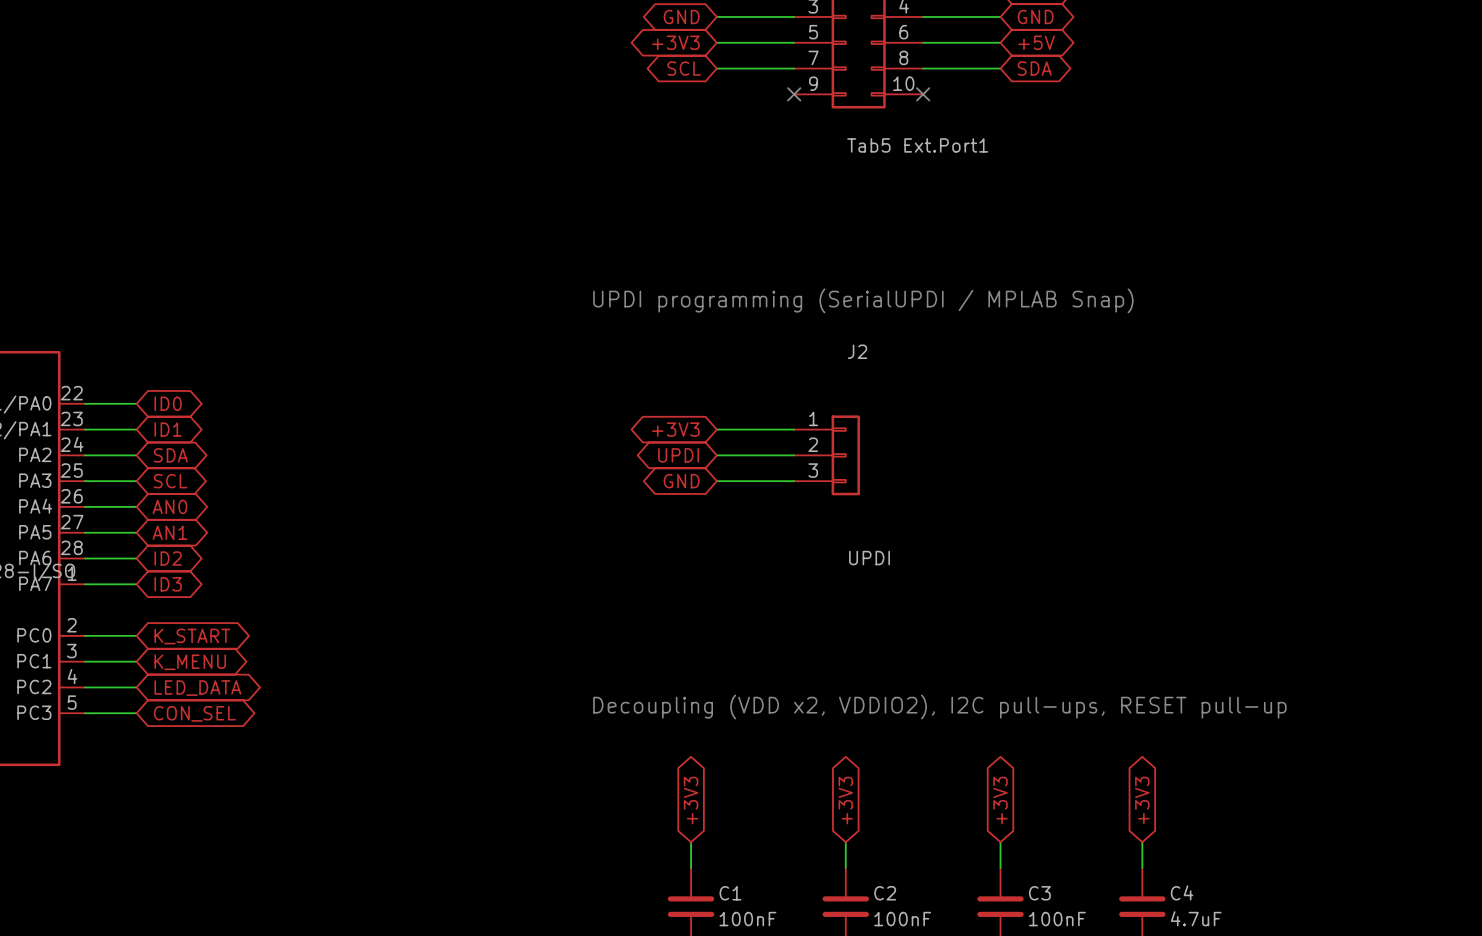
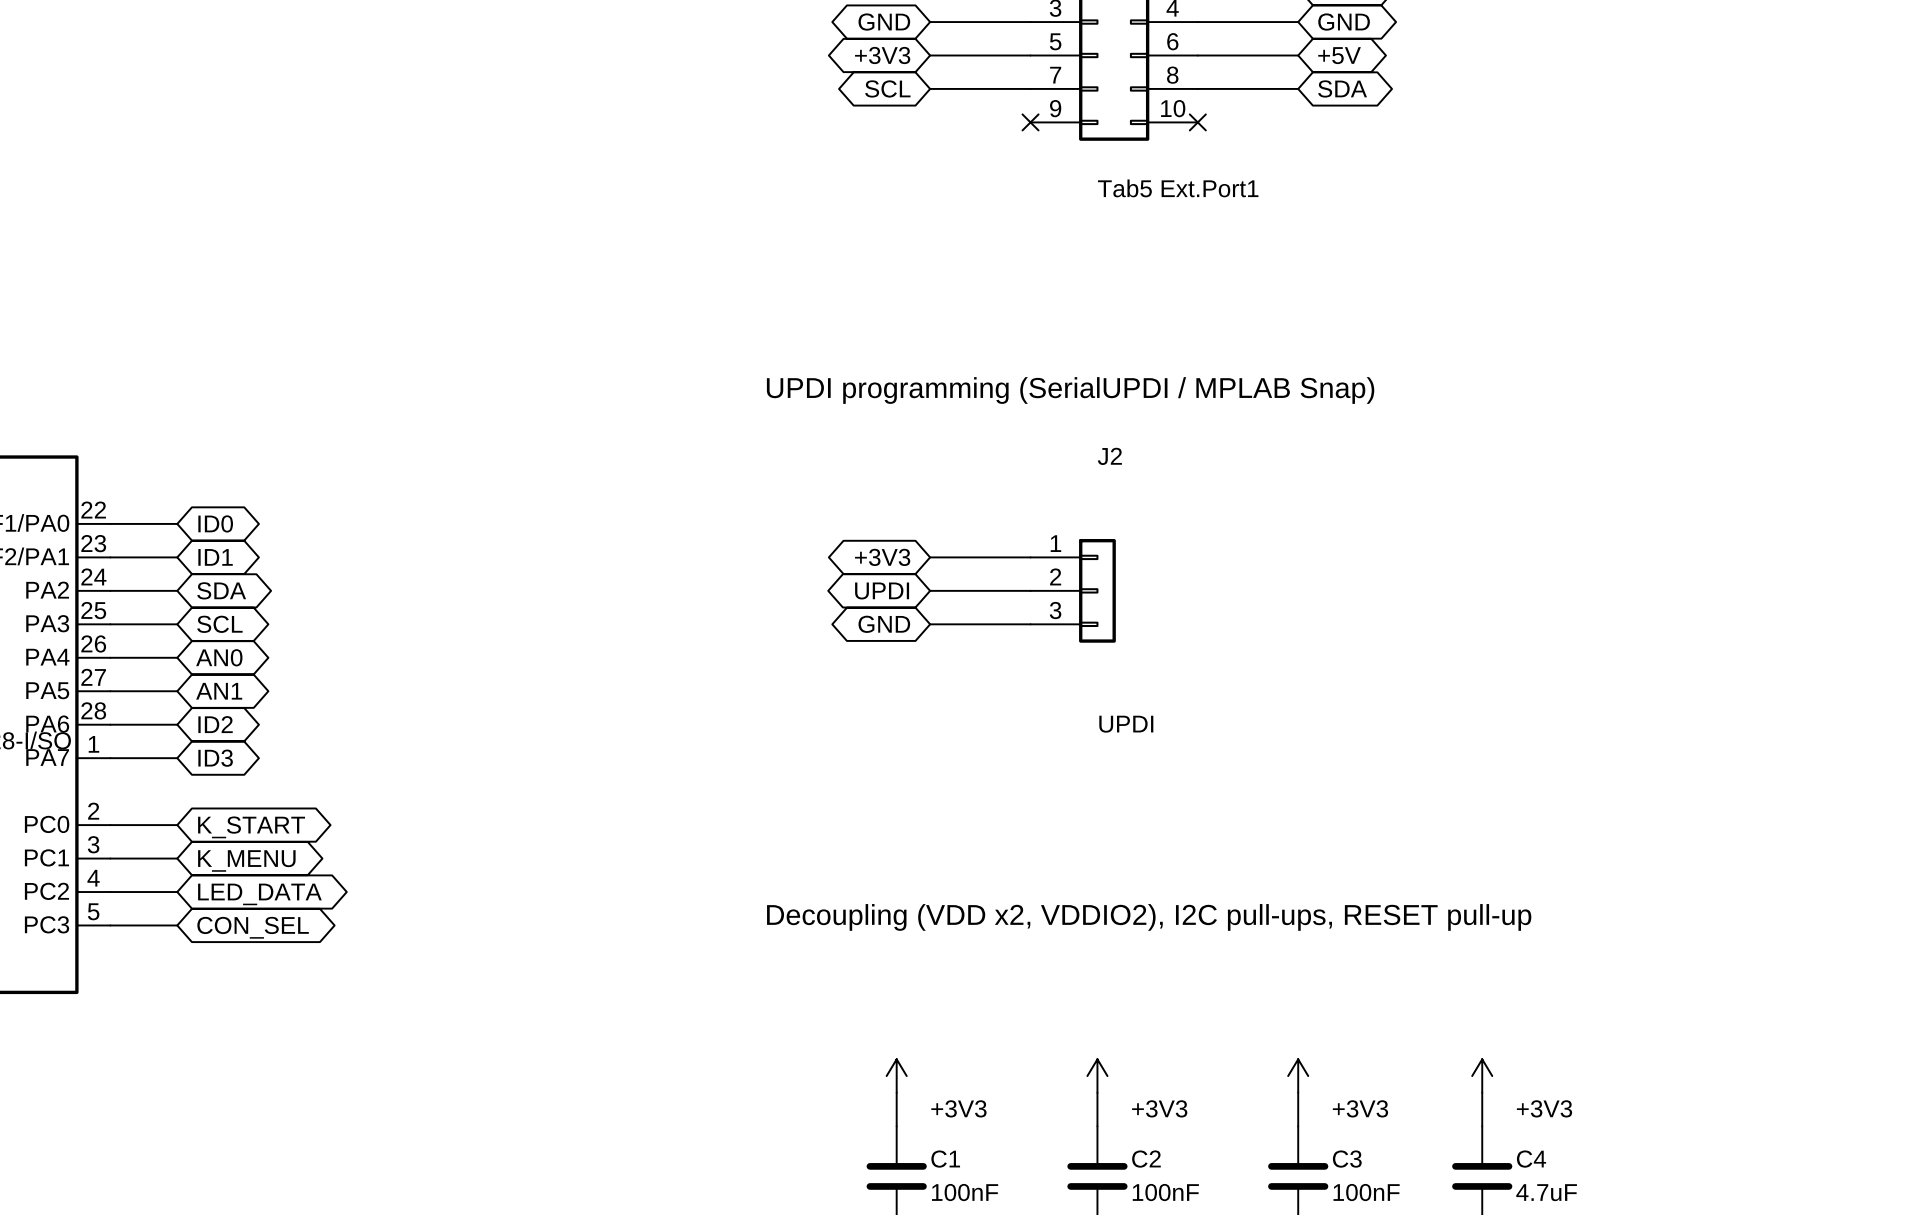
global label: +3V3 (691, 800) -> none
global label: +3V3 (845, 800) -> none
global label: +3V3 (1000, 800) -> none
global label: +3V3 (1142, 800) -> none
power symbol: none -> +3V3 (896, 1076)
power symbol: none -> +3V3 (1097, 1076)
power symbol: none -> +3V3 (1298, 1076)
power symbol: none -> +3V3 (1482, 1076)

